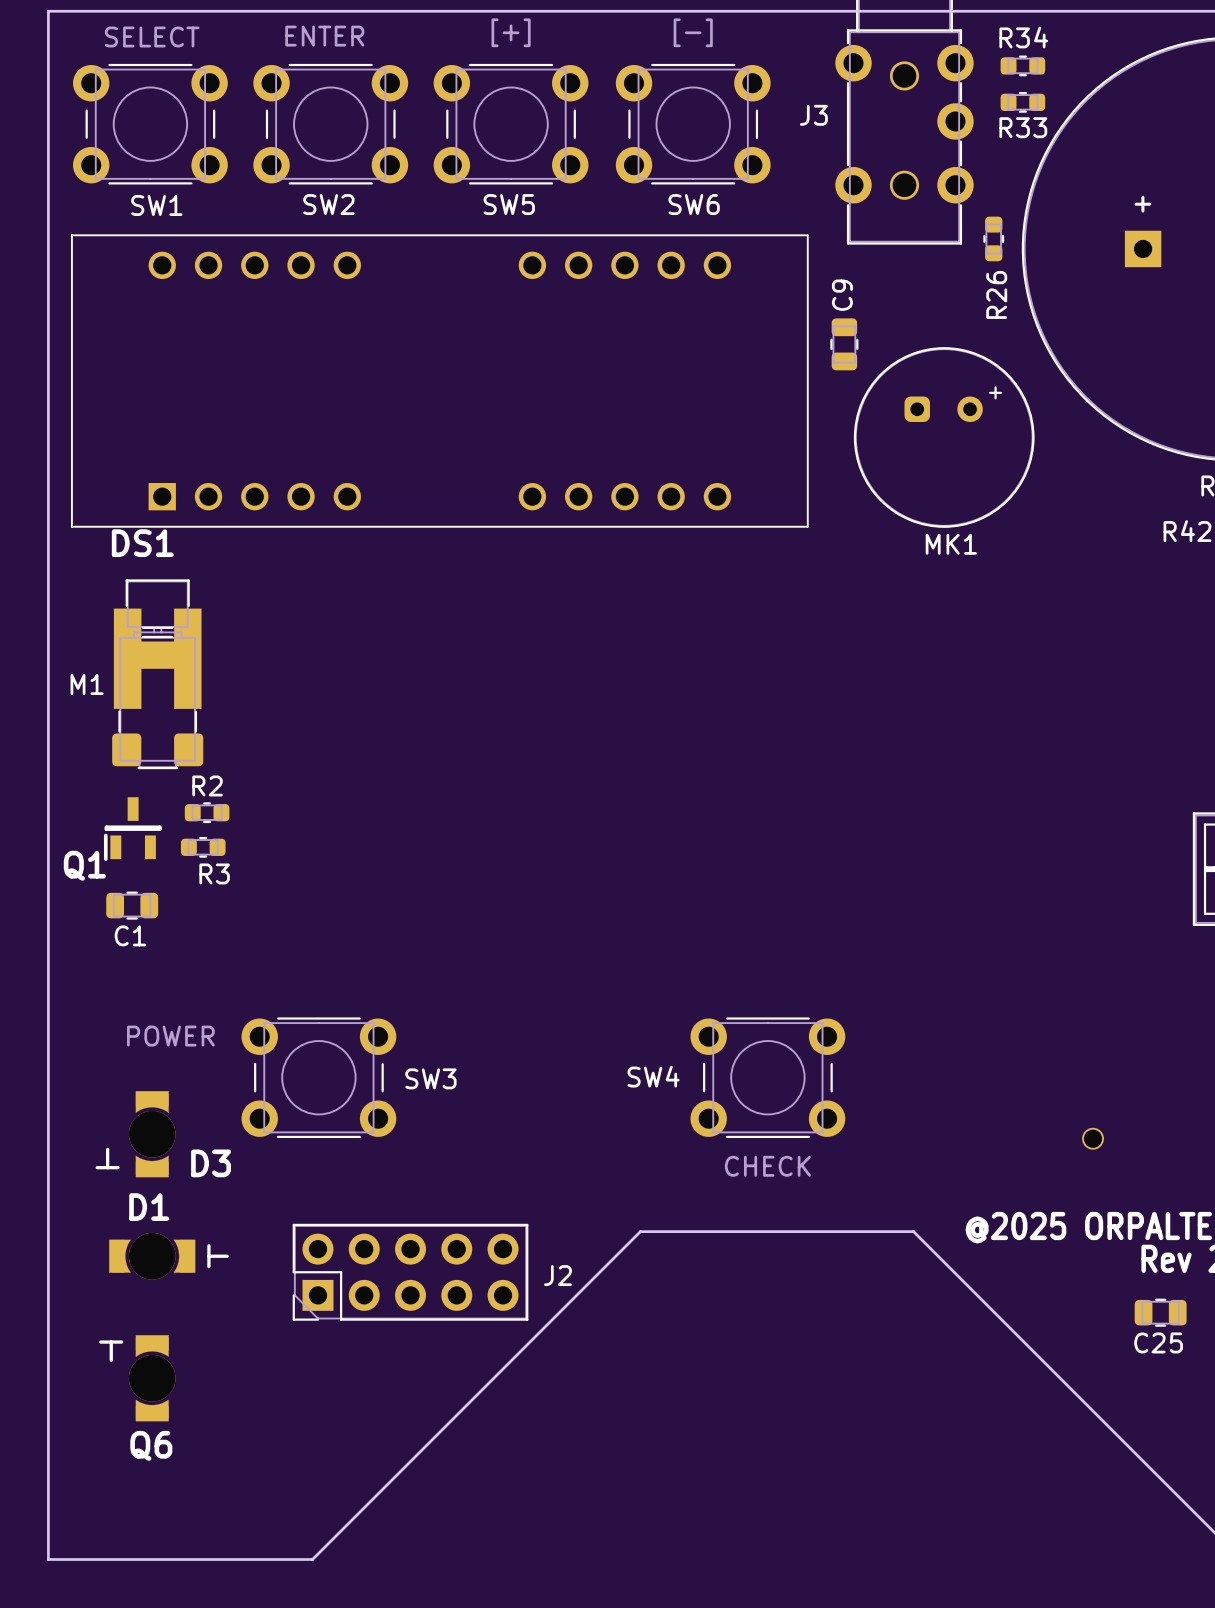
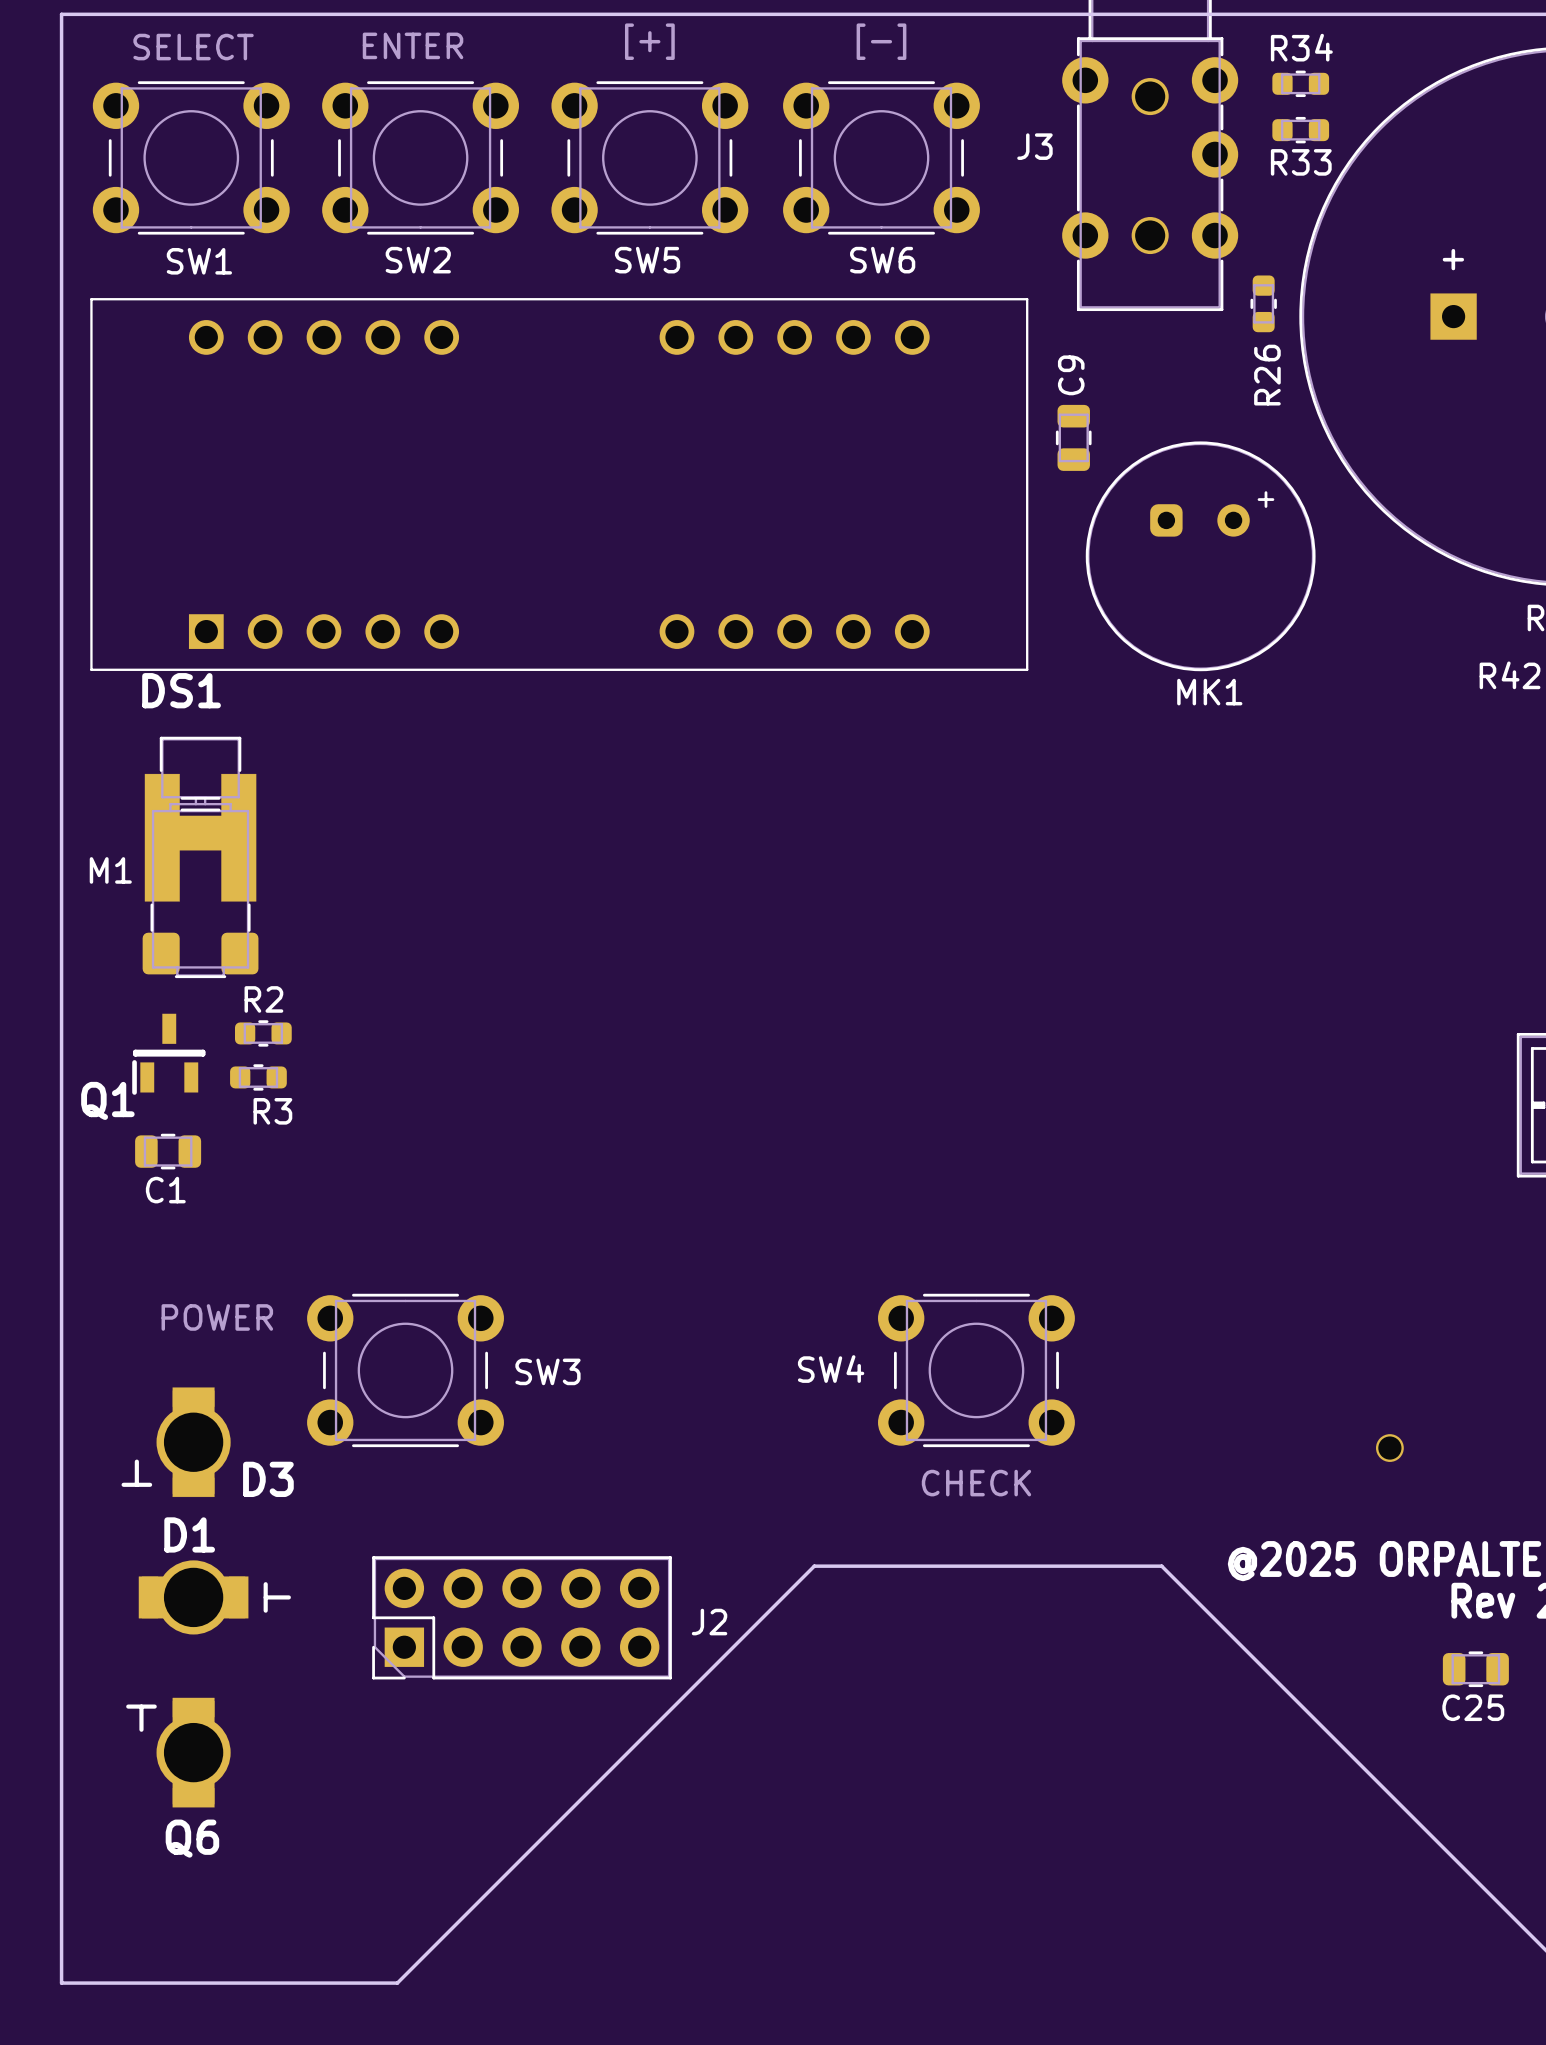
D3 footprint: [128, 1091, 176, 1178] -> [156, 1387, 231, 1498]
D1 footprint: [109, 1232, 196, 1280] -> [138, 1560, 249, 1635]
Q6 footprint: [128, 1335, 176, 1422] -> [156, 1697, 231, 1808]

